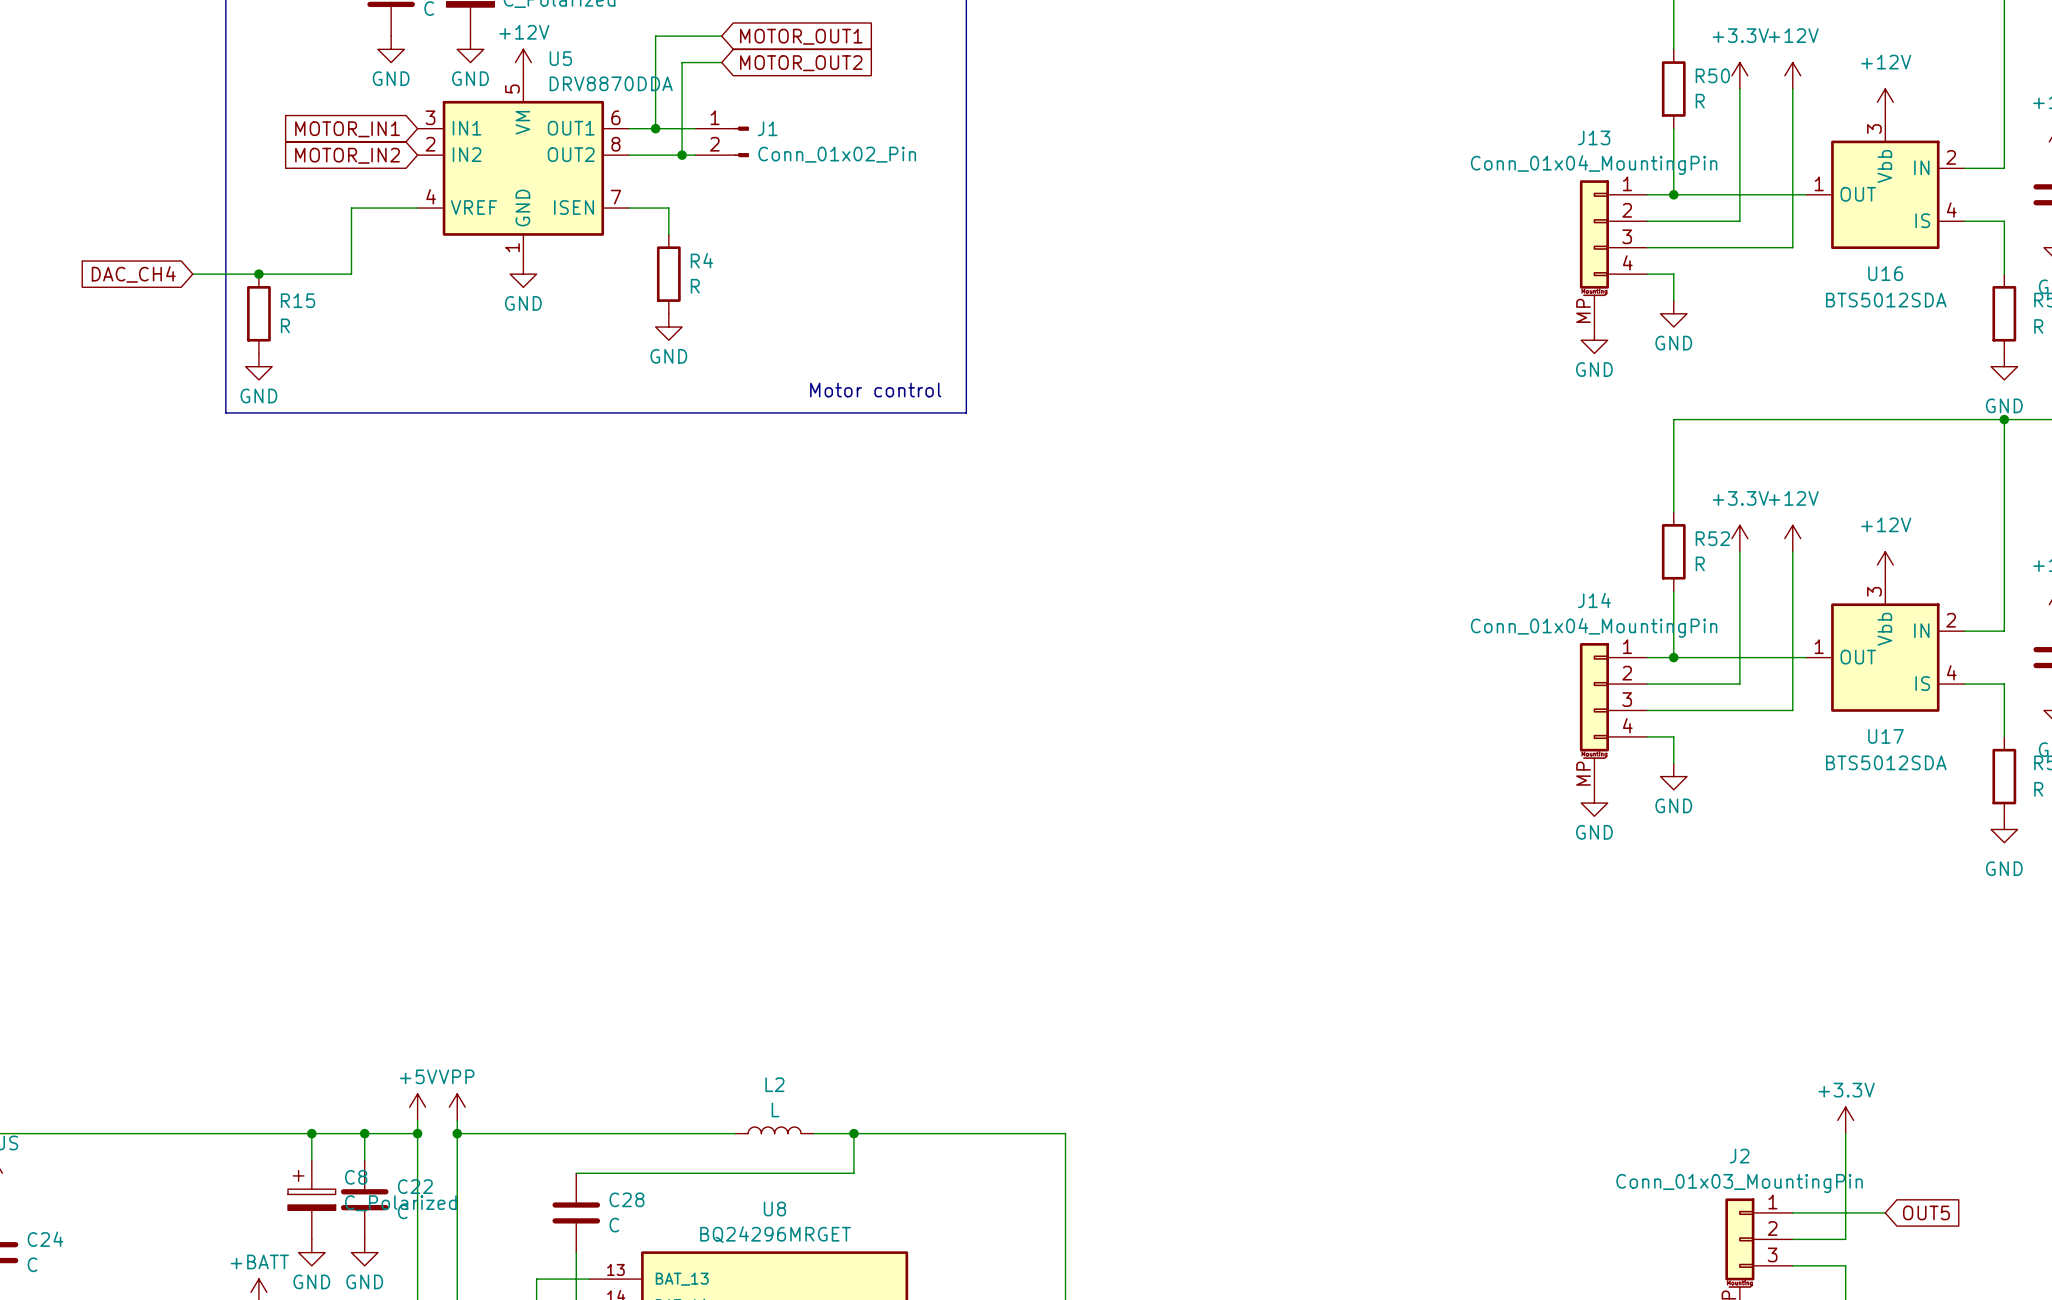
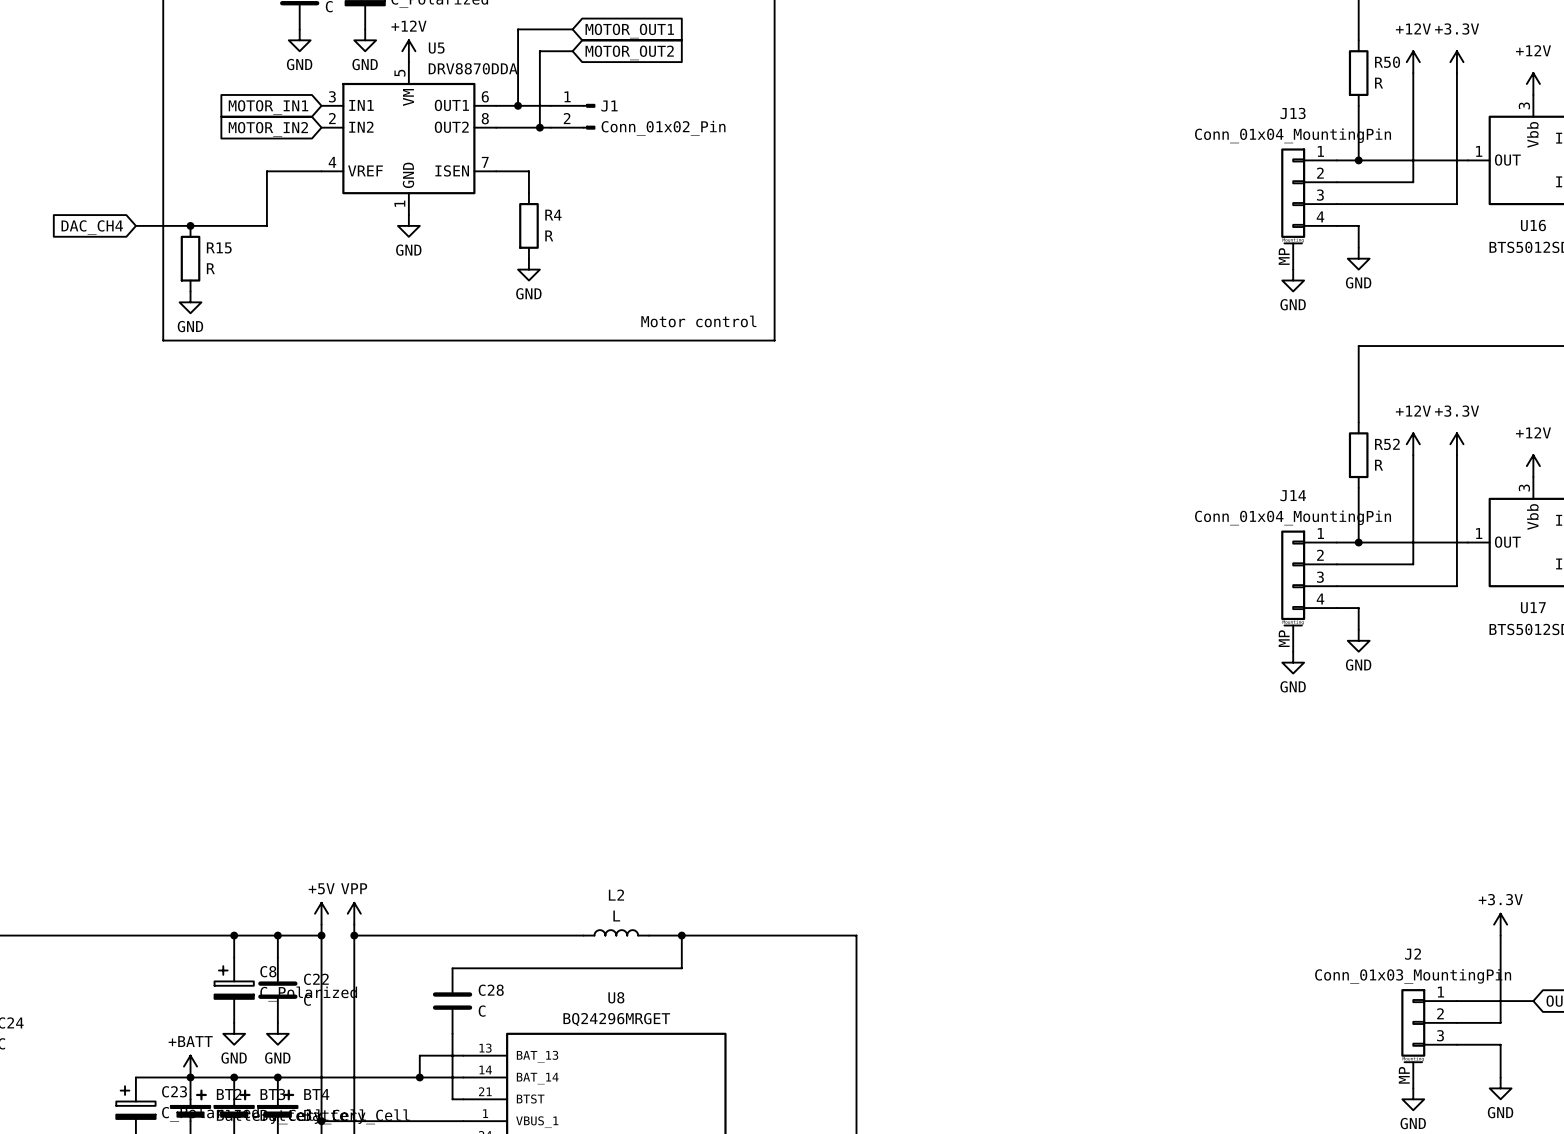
power symbol: +3.3V (1739, 75) -> +12V (1413, 62)
power symbol: +12V (1792, 75) -> +3.3V (1456, 62)
power symbol: +3.3V (1739, 538) -> +12V (1413, 444)
power symbol: +12V (1792, 538) -> +3.3V (1456, 444)

